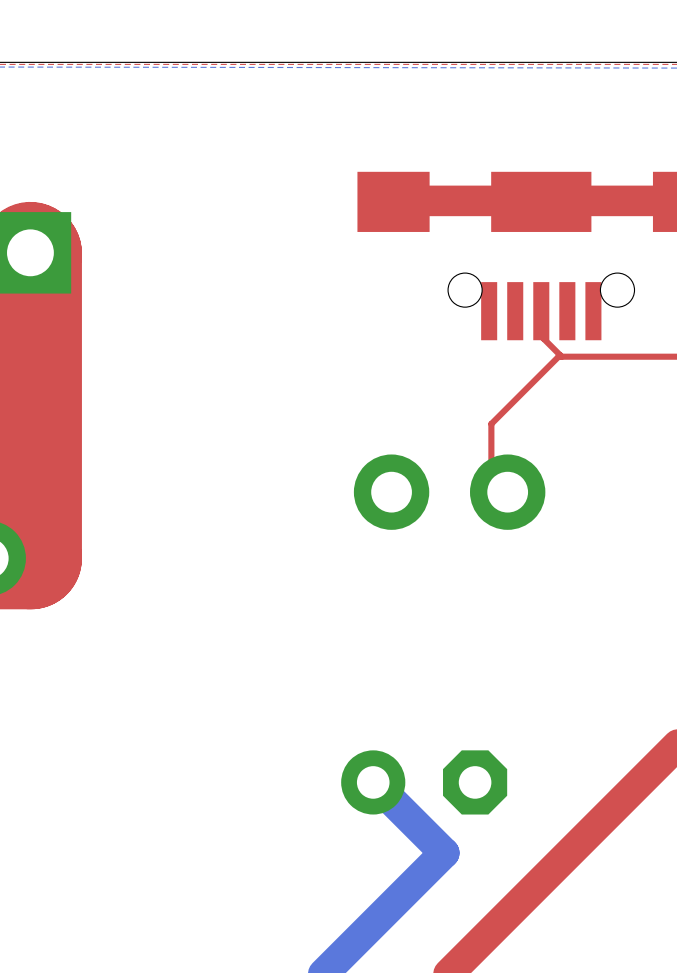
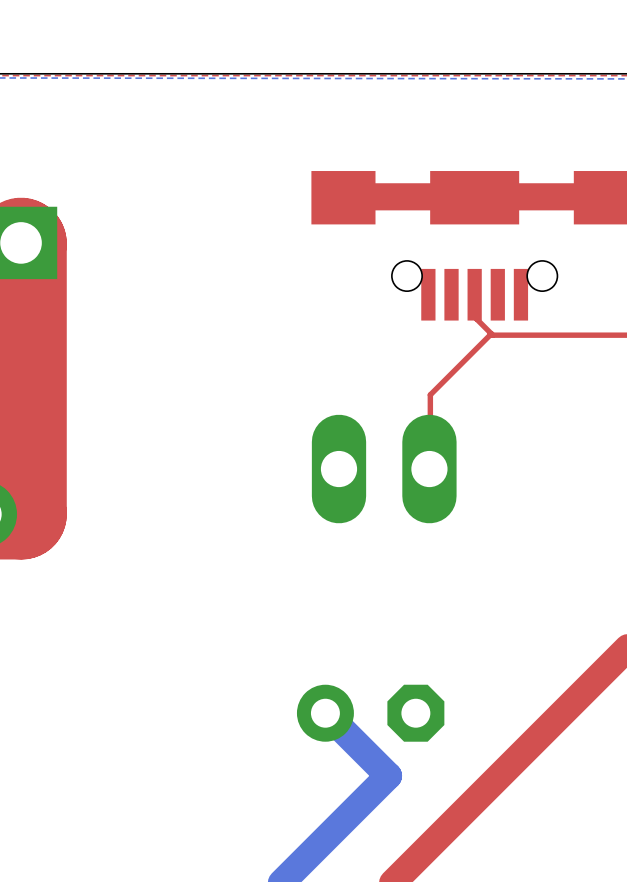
part footprint: [353, 454, 546, 530] -> [311, 414, 457, 524]

